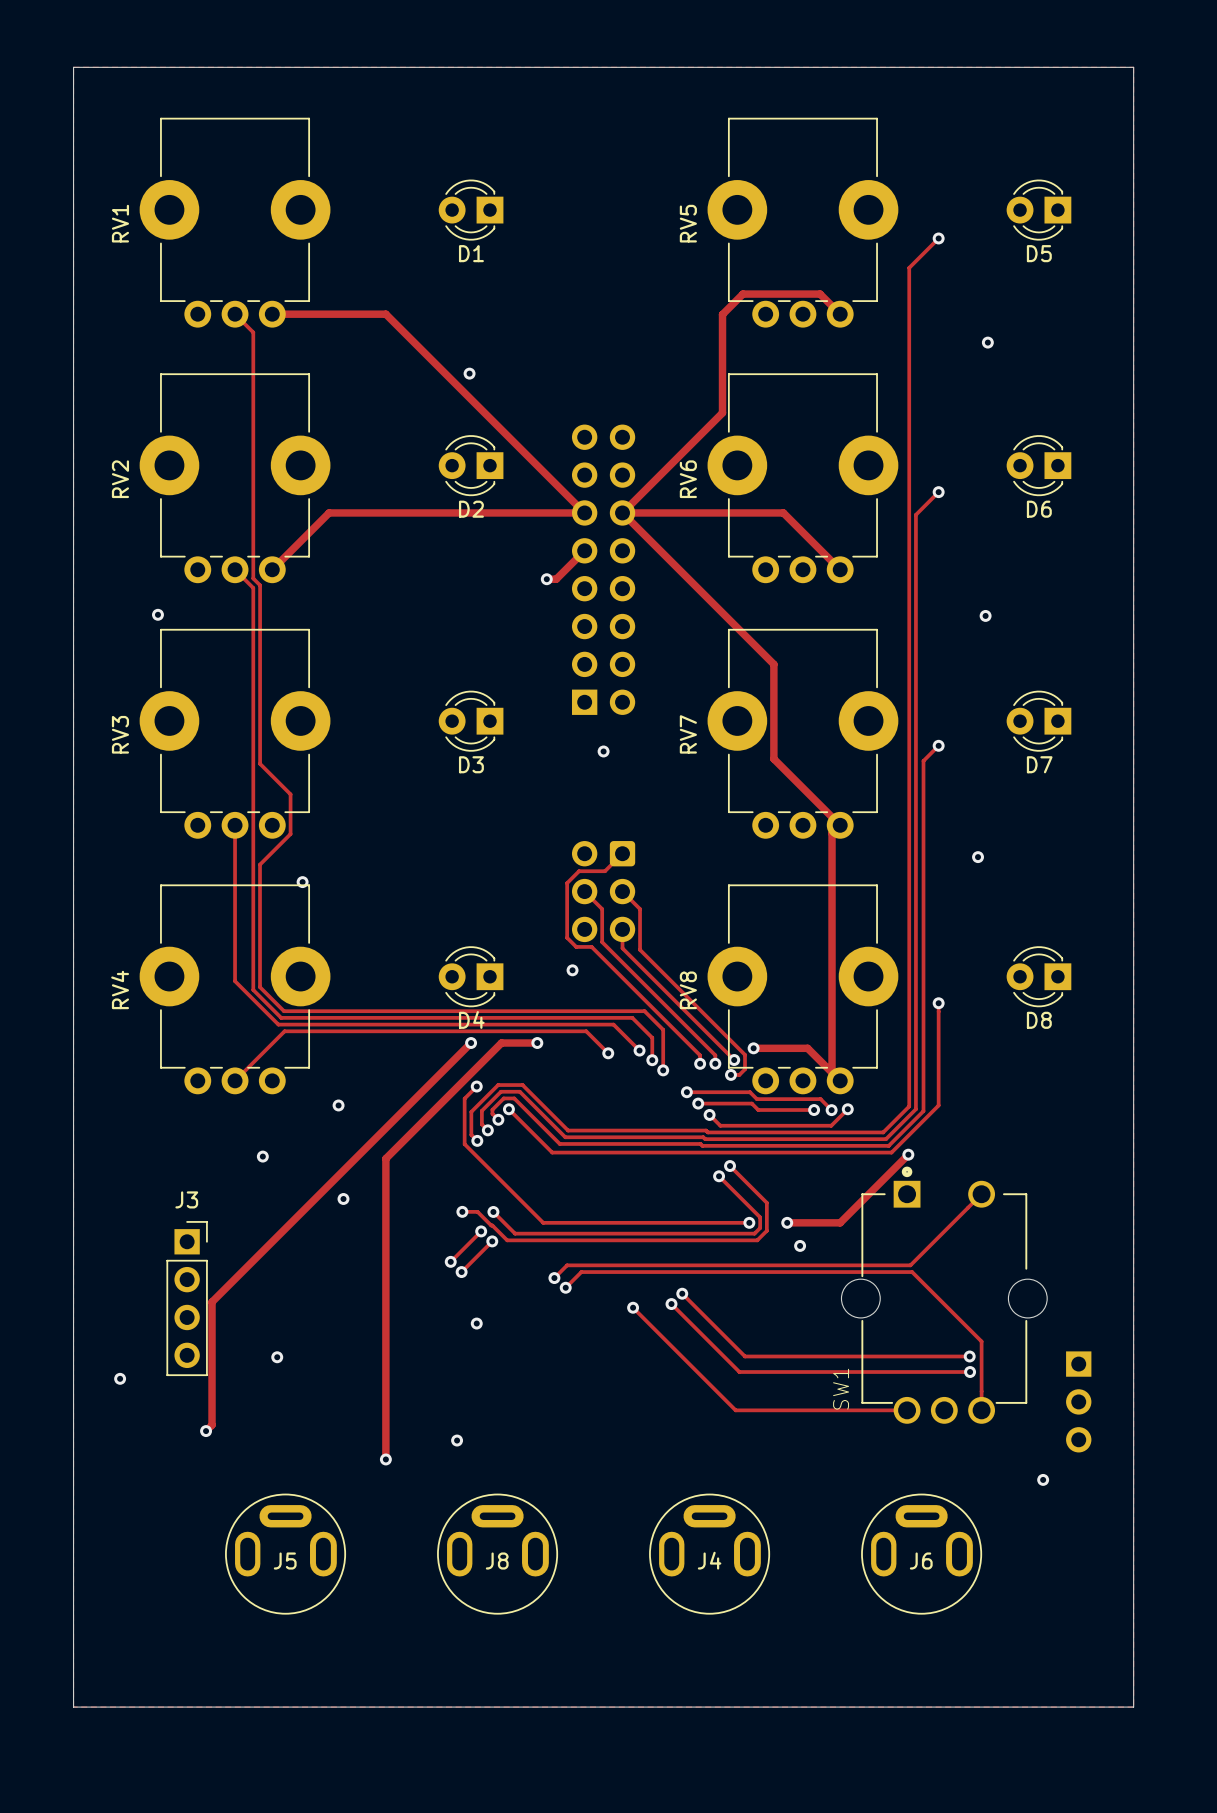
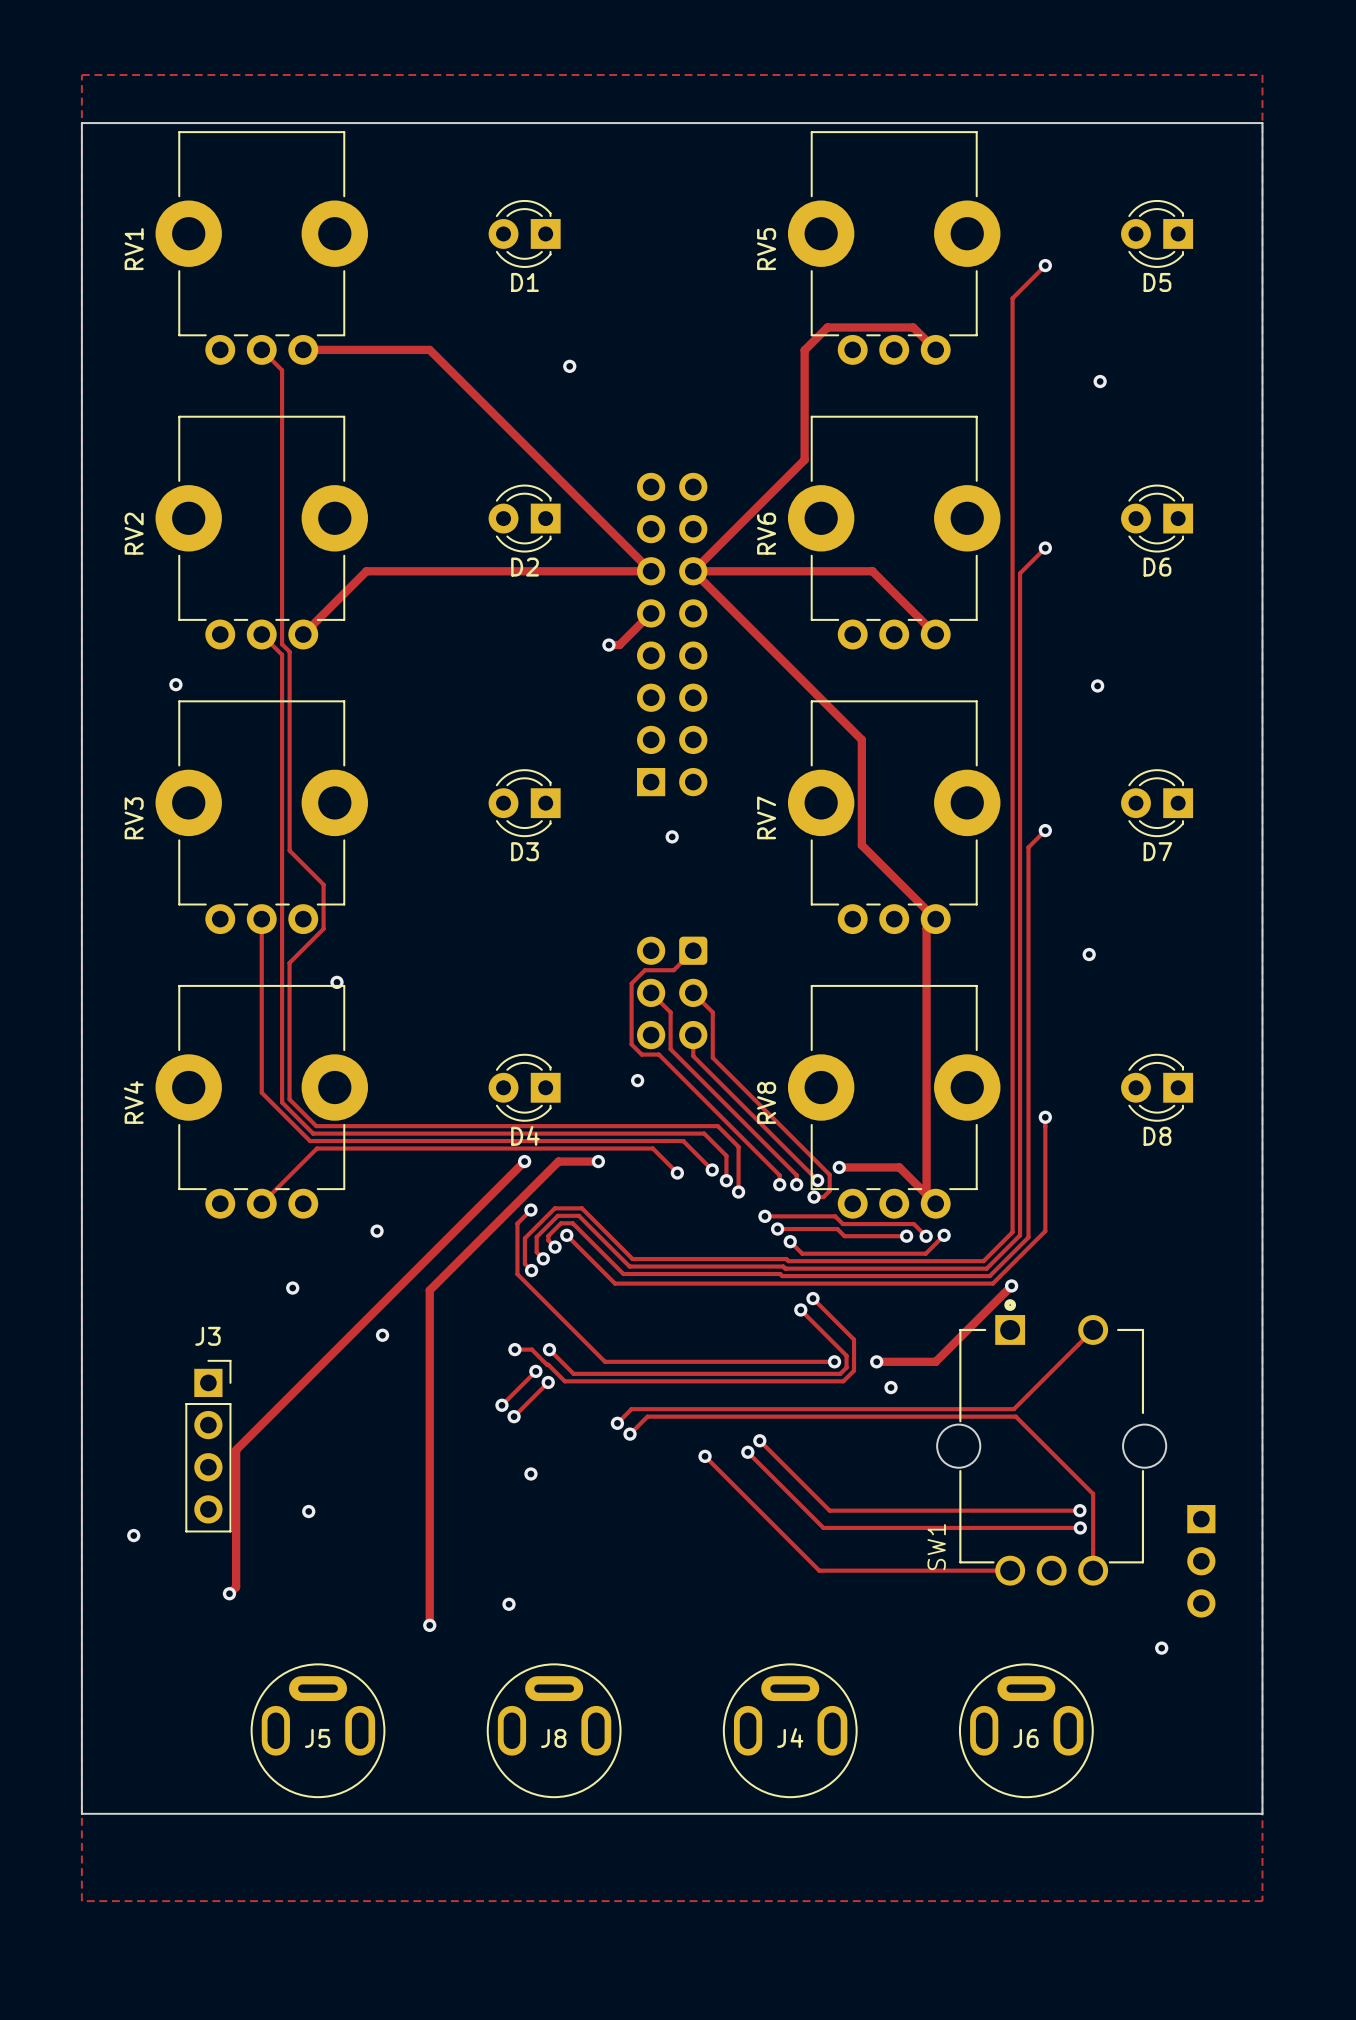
board edge: (73, 110) (73, 67) (1133, 67) (1133, 110) -> (81, 123) (1262, 123)
via position: (469, 373) -> (569, 366)
board edge: (73, 1628) (73, 1707) (1133, 1707) (1133, 1628) -> (81, 1813) (1262, 1813)

